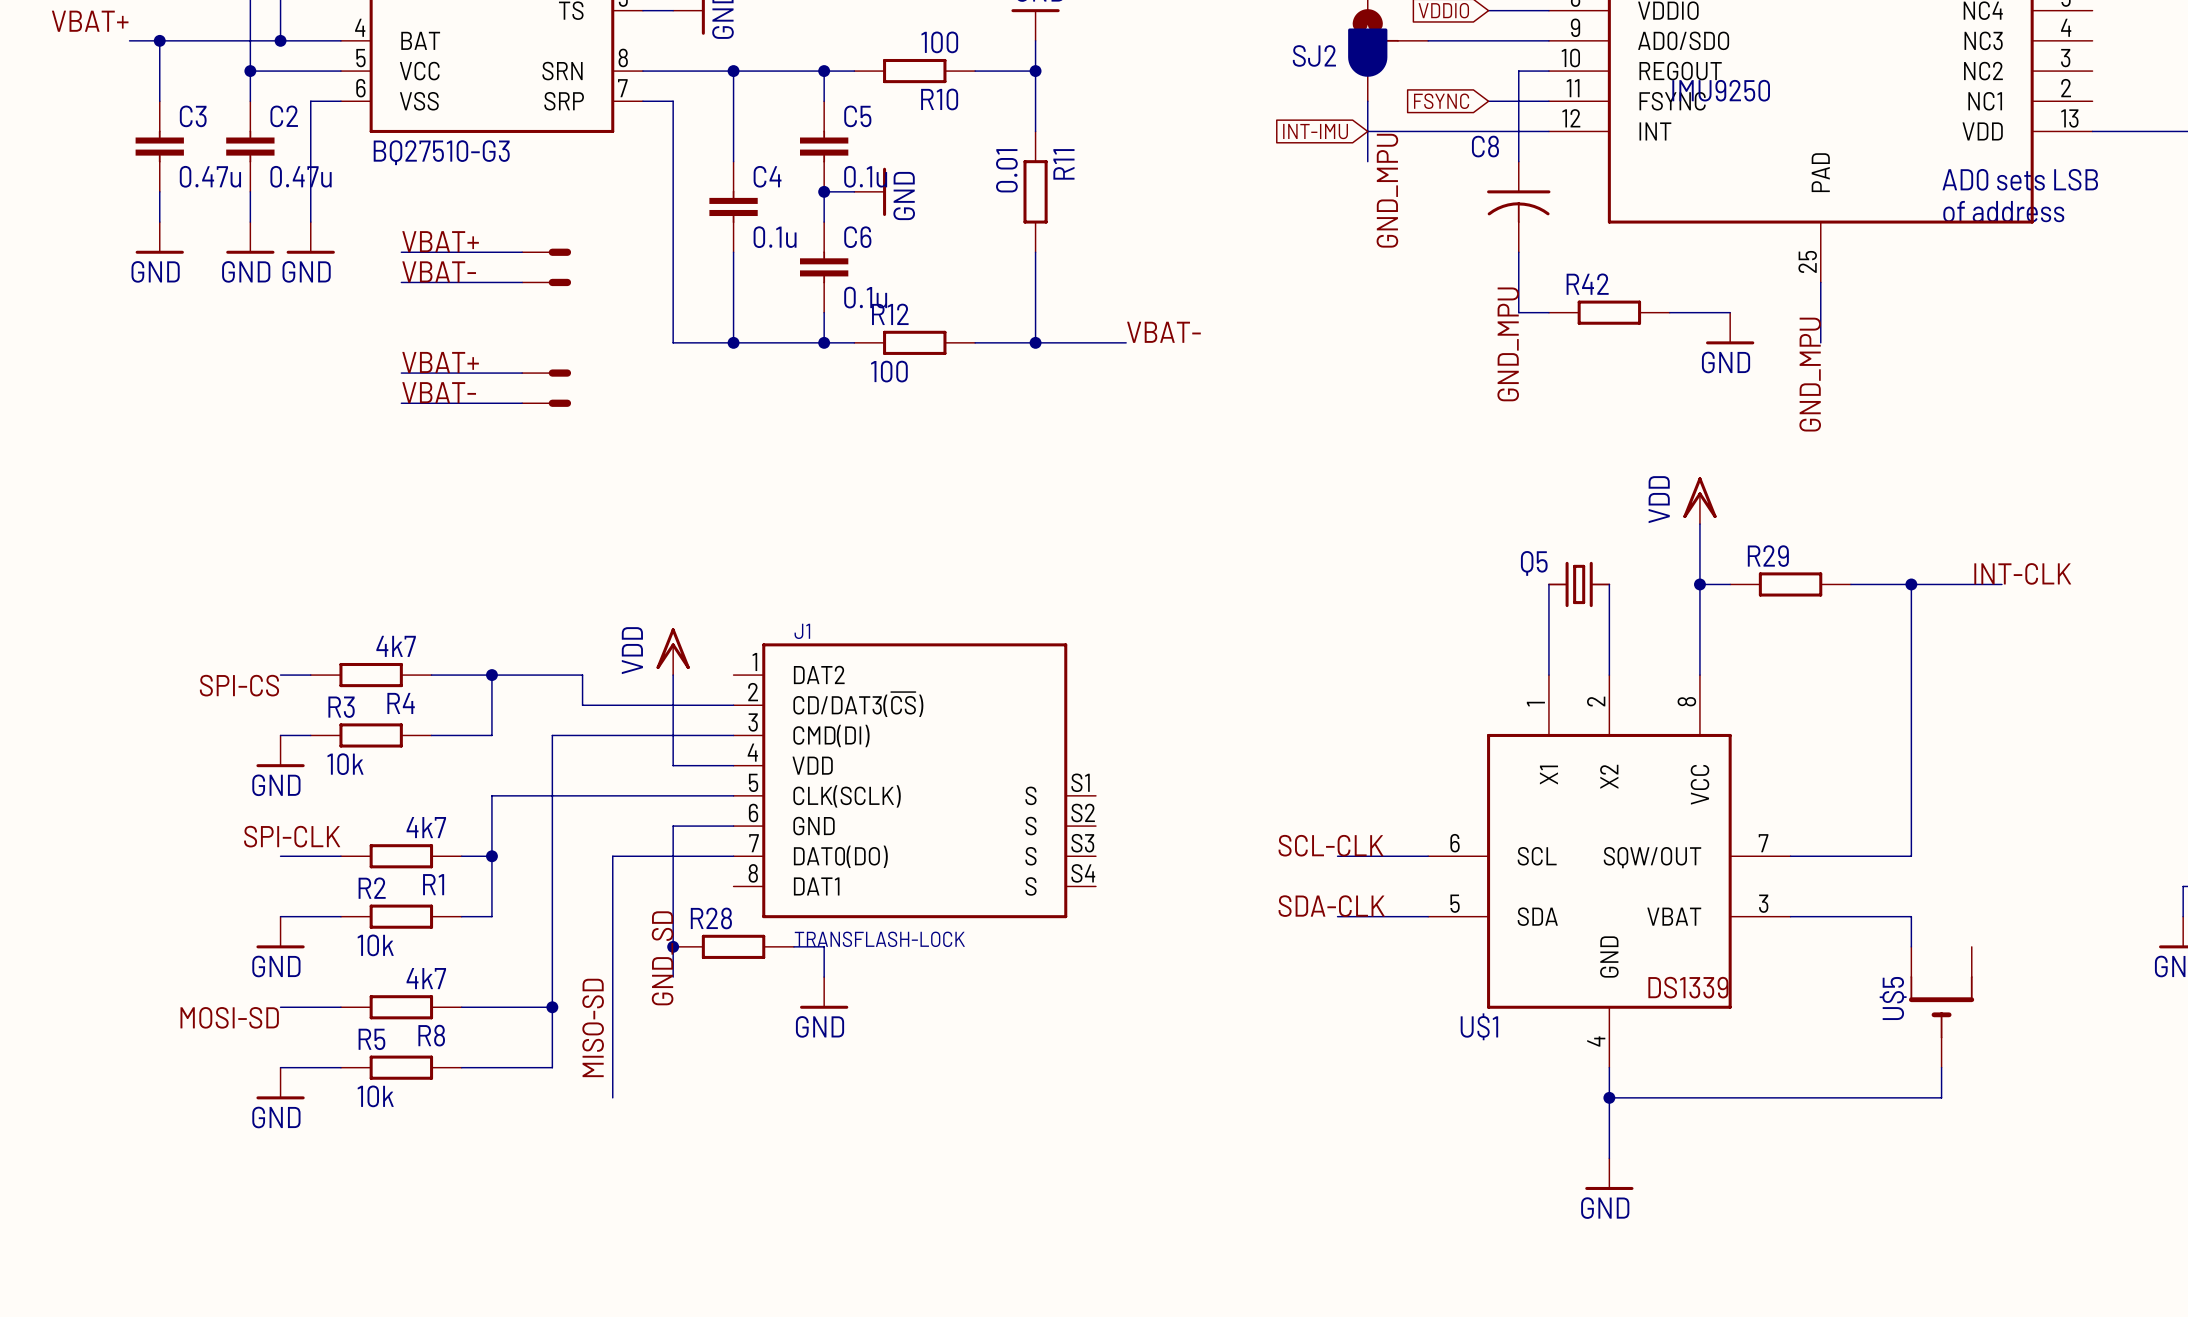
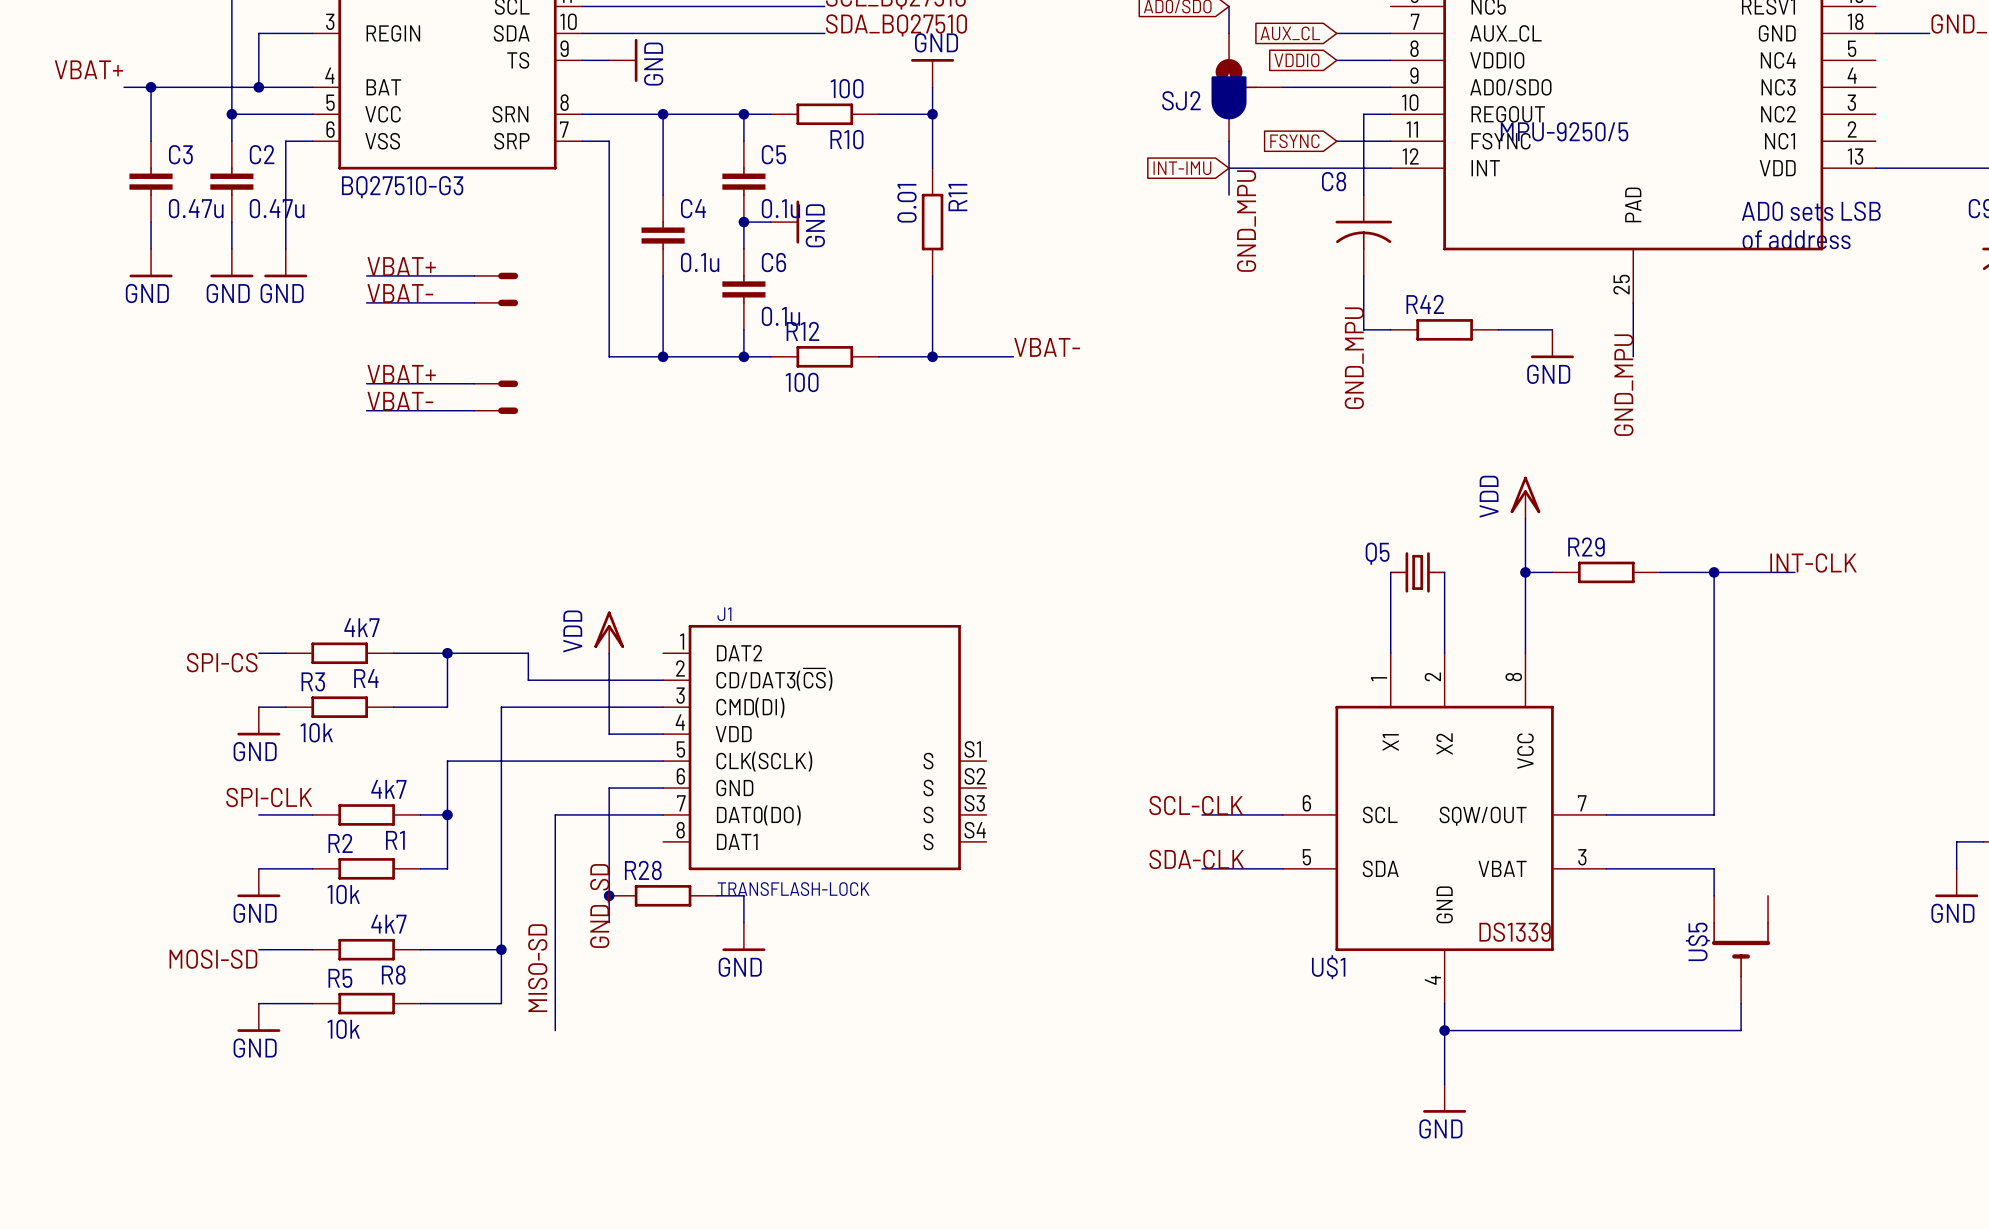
part value: IMU9250 (1721, 90) -> MPU-9250/5 (1564, 131)

